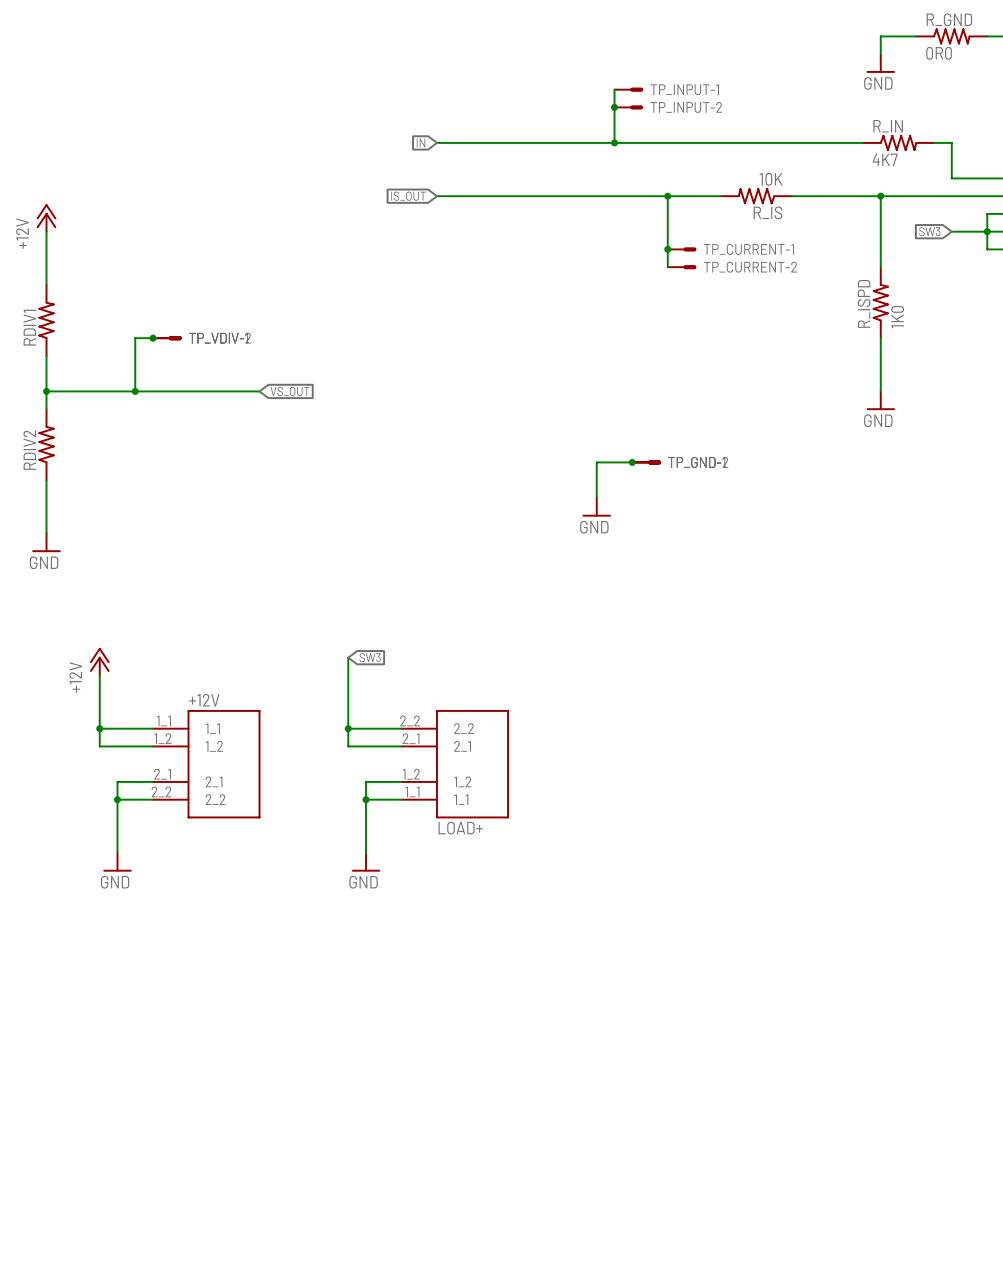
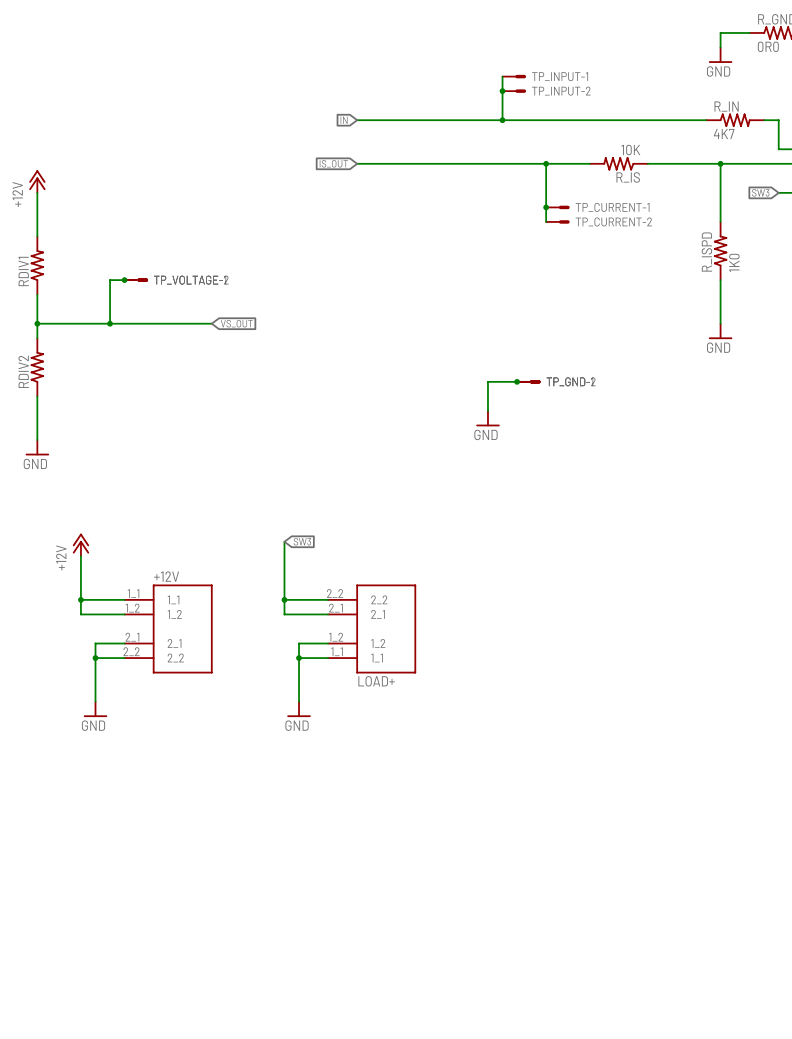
part: (167, 338) -> none
part: (167, 338) -> none
part: none -> (136, 280)
part: none -> (136, 280)

